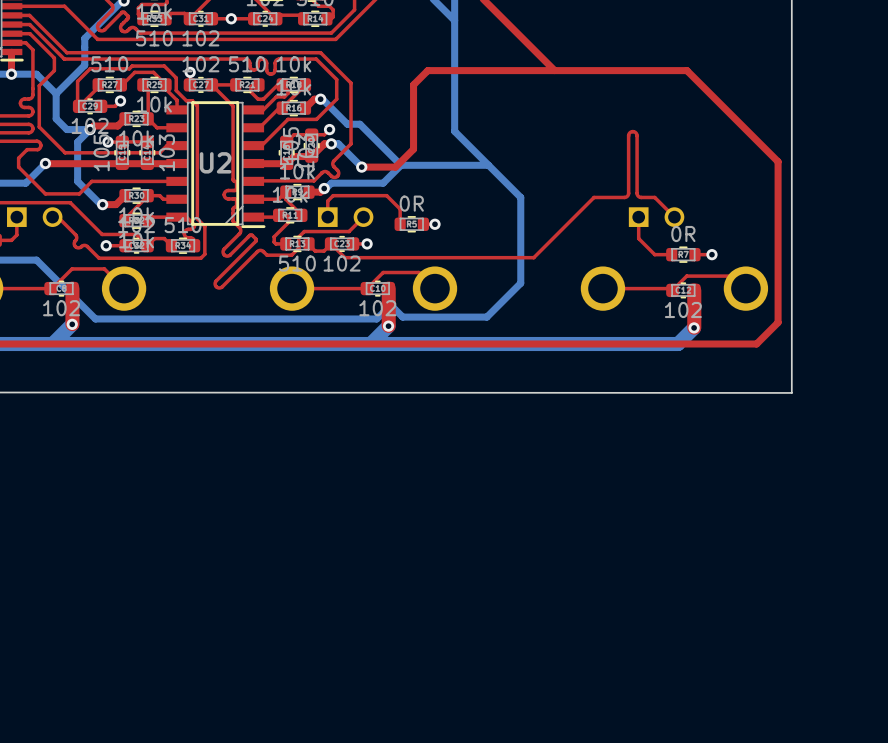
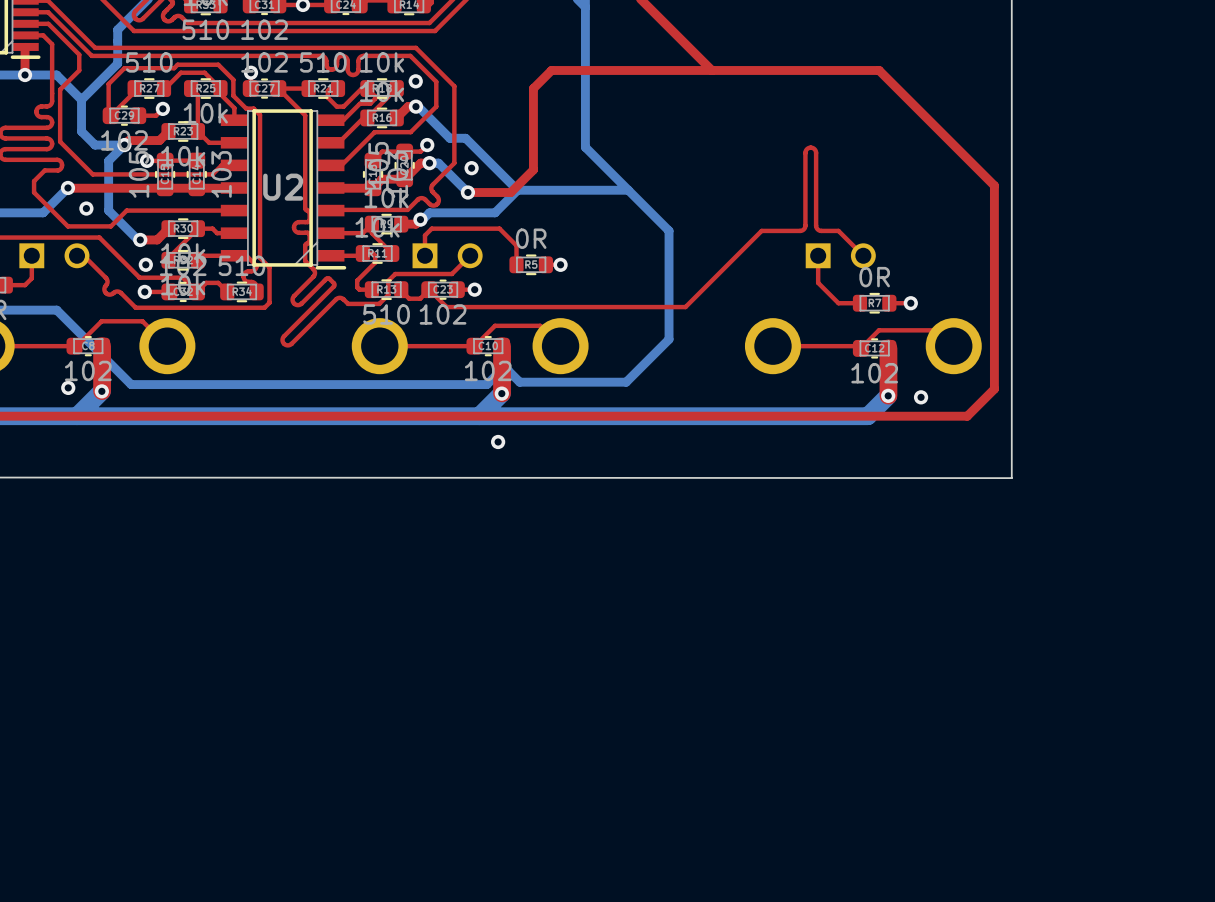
via: none -> (415, 81)
via: none -> (471, 168)
via: none -> (86, 208)
via: none -> (145, 264)
via: none -> (68, 387)
via: none -> (921, 397)
via: none -> (498, 441)

